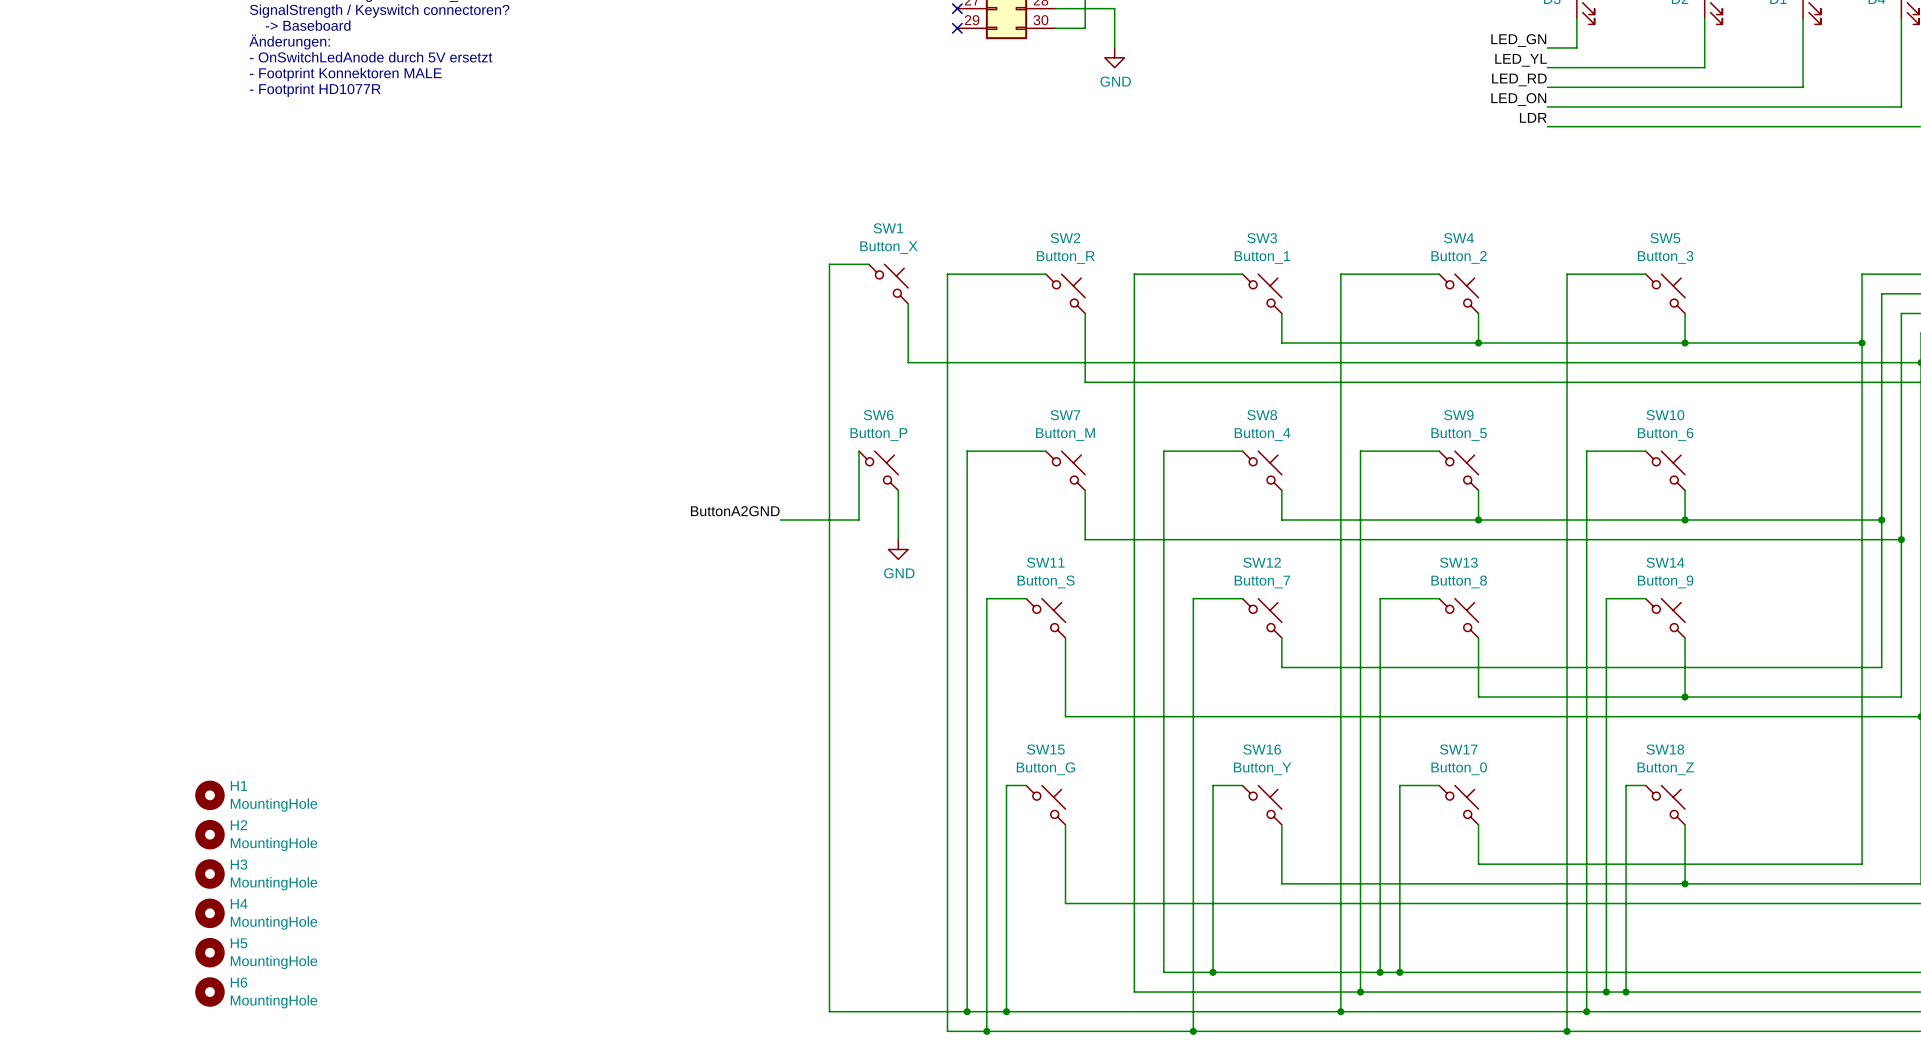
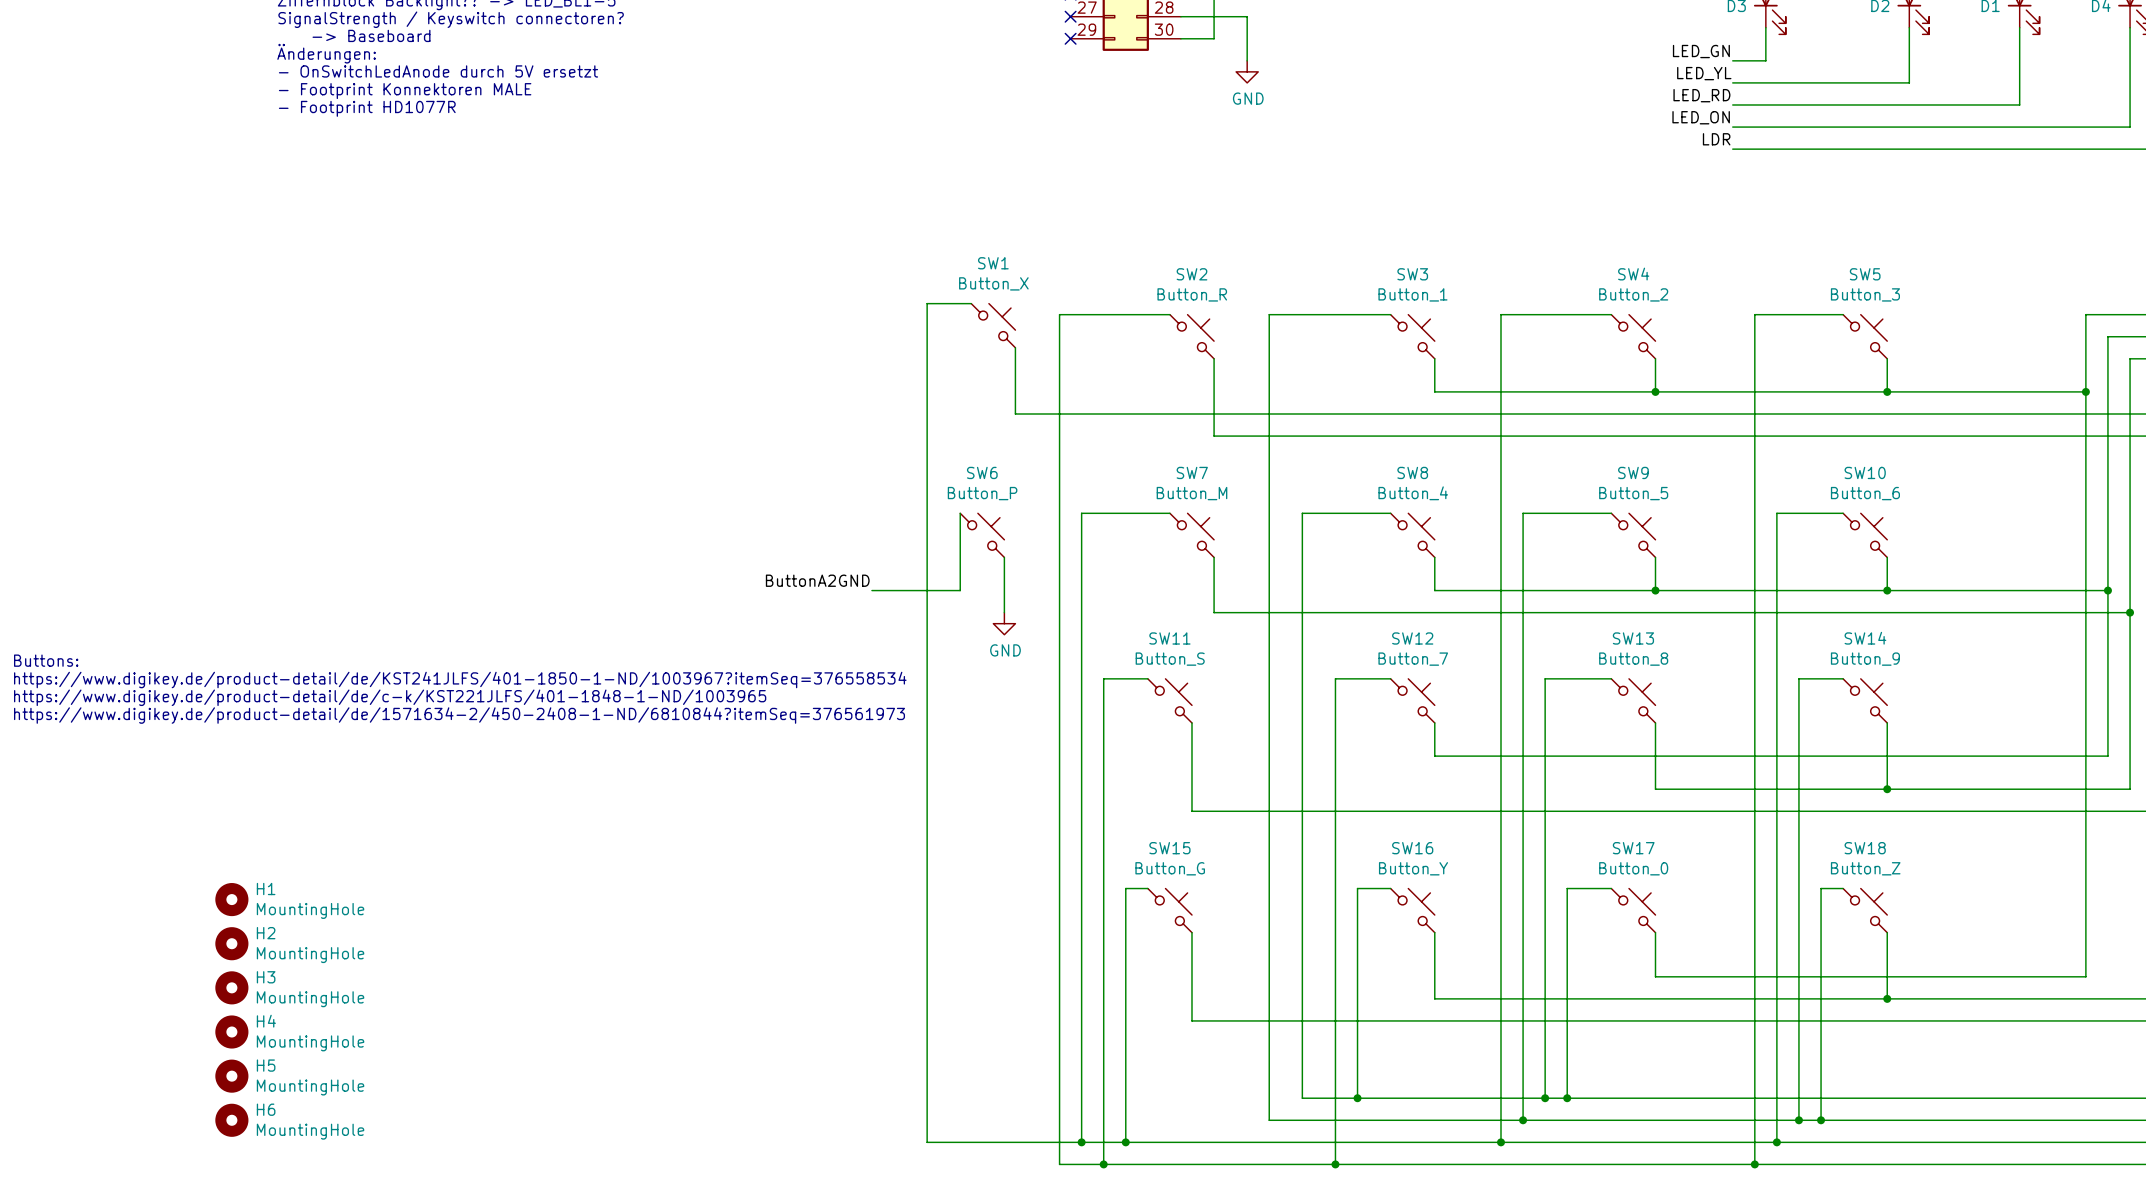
text: none -> Buttons: (46, 660)
text: none -> https://www.digikey.de/product-detail/de/KST241JLFS/401-1850-1-ND/1003967?itemSeq=376558534 (460, 680)
text: none -> https://www.digikey.de/product-detail/de/c-k/KST221JLFS/401-1848-1-ND/1003965 (390, 697)
text: none -> https://www.digikey.de/product-detail/de/1571634-2/450-2408-1-ND/6810844?itemSeq=376561973 (459, 715)

